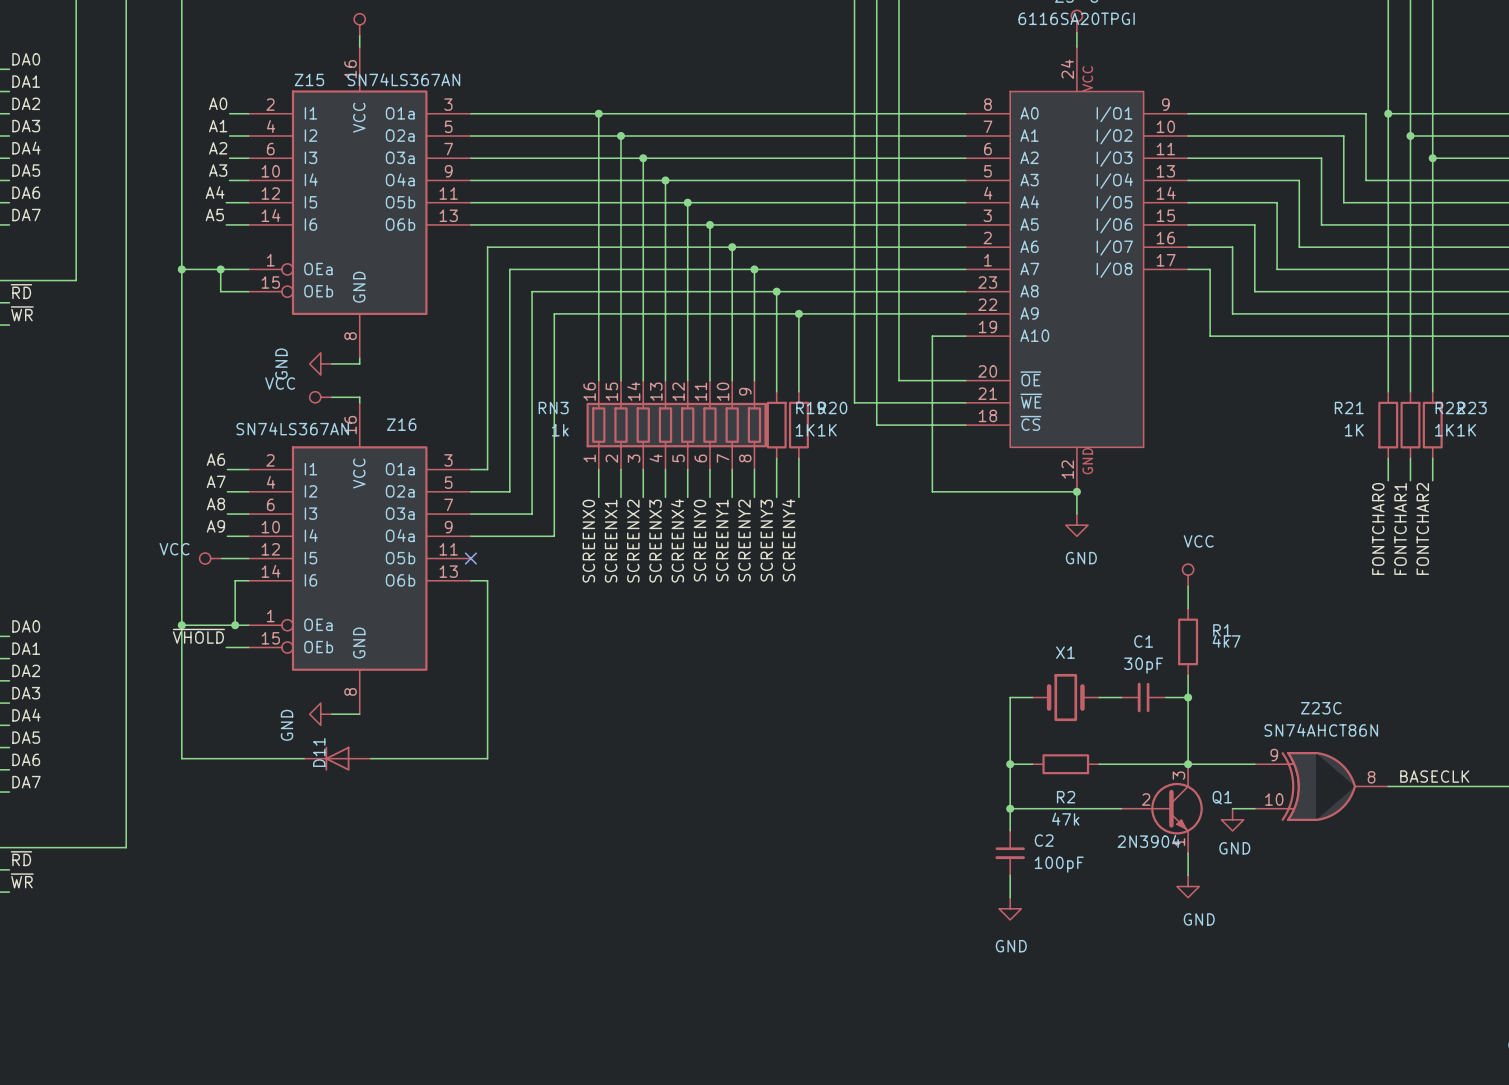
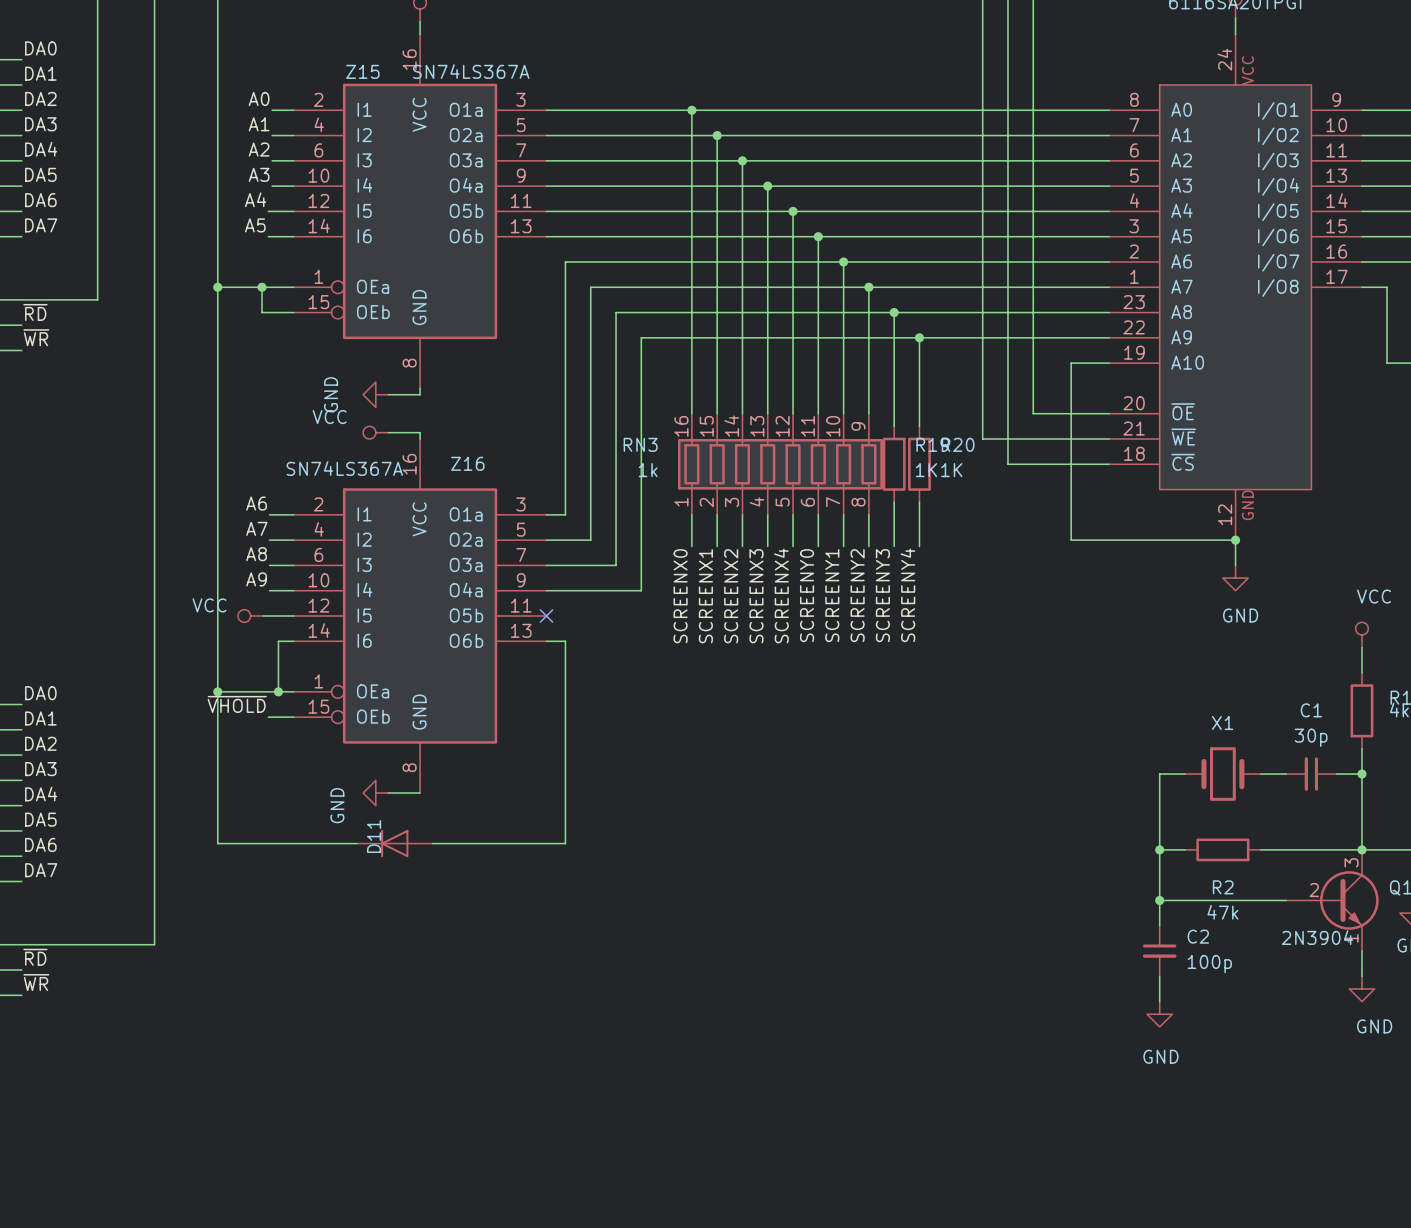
Z15 value: SN74LS367AN (403, 79) -> SN74LS367A (471, 71)
Z16 value: SN74LS367AN (292, 428) -> SN74LS367A (344, 468)
C1 value: 30pF (1143, 665) -> 30p (1311, 737)
C2 value: 100pF (1059, 864) -> 100p (1209, 964)

